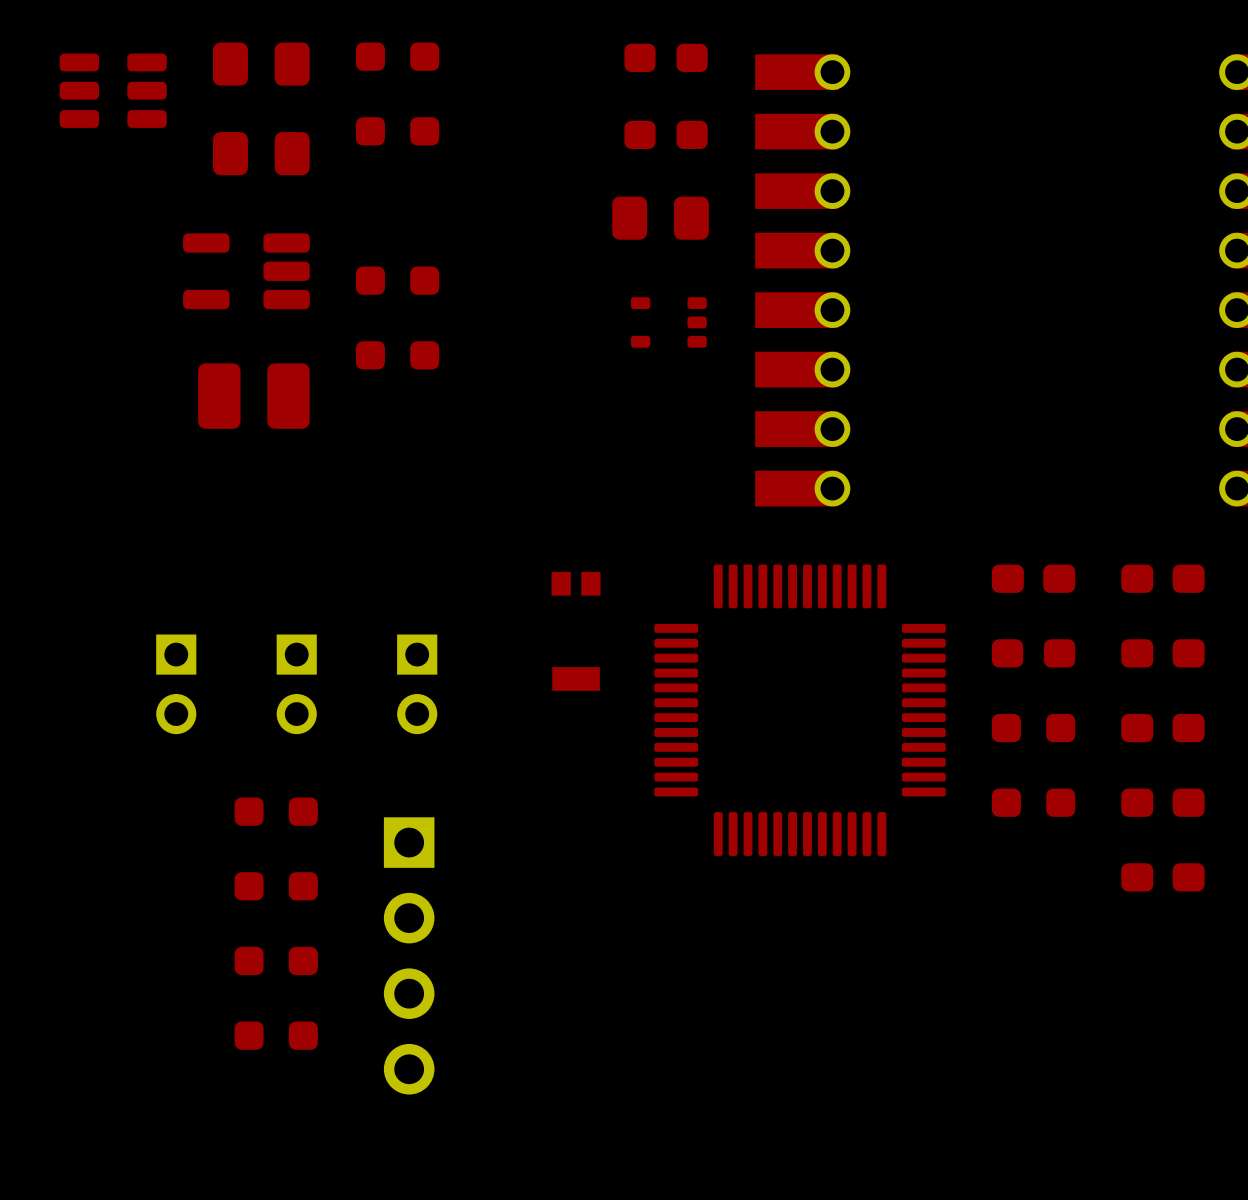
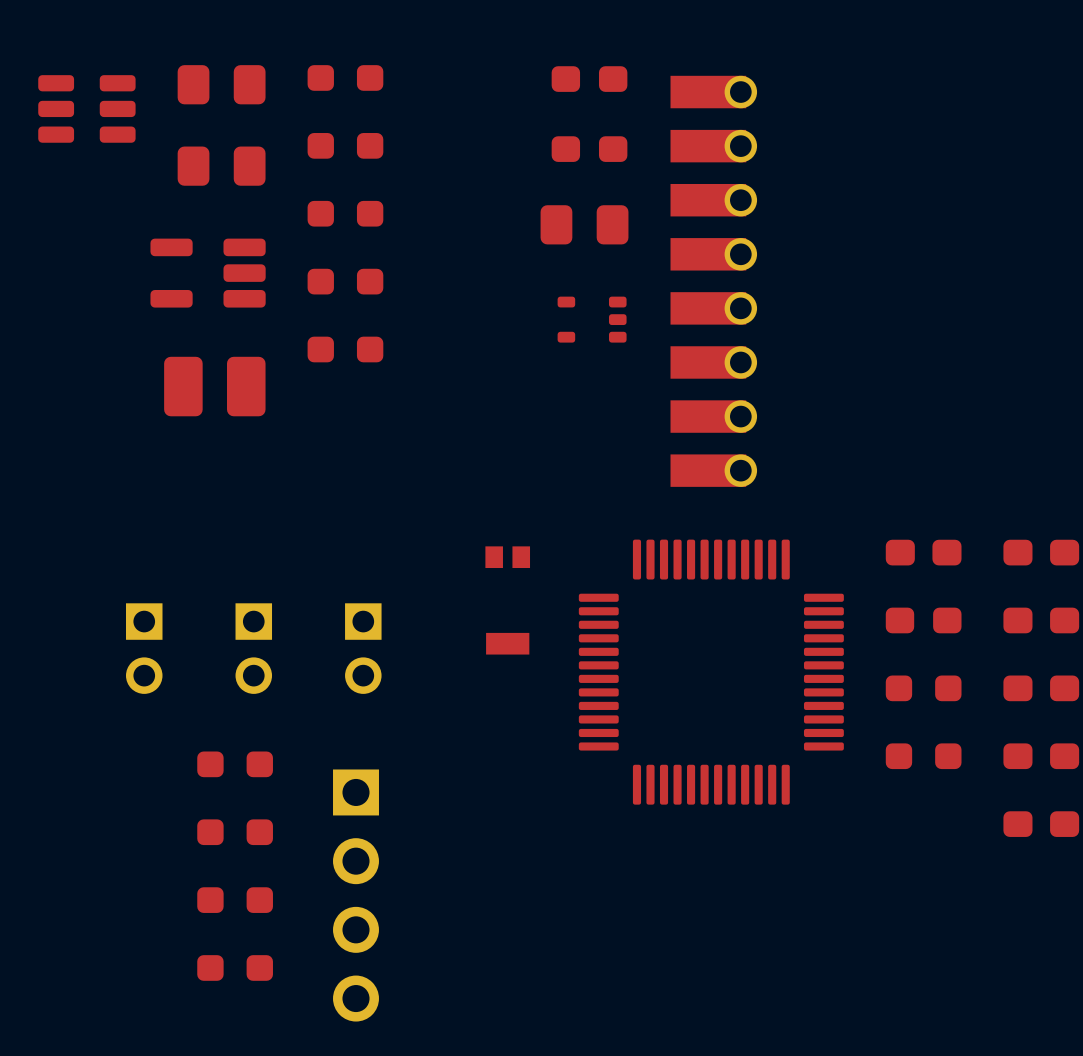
part: none -> (345, 213)

